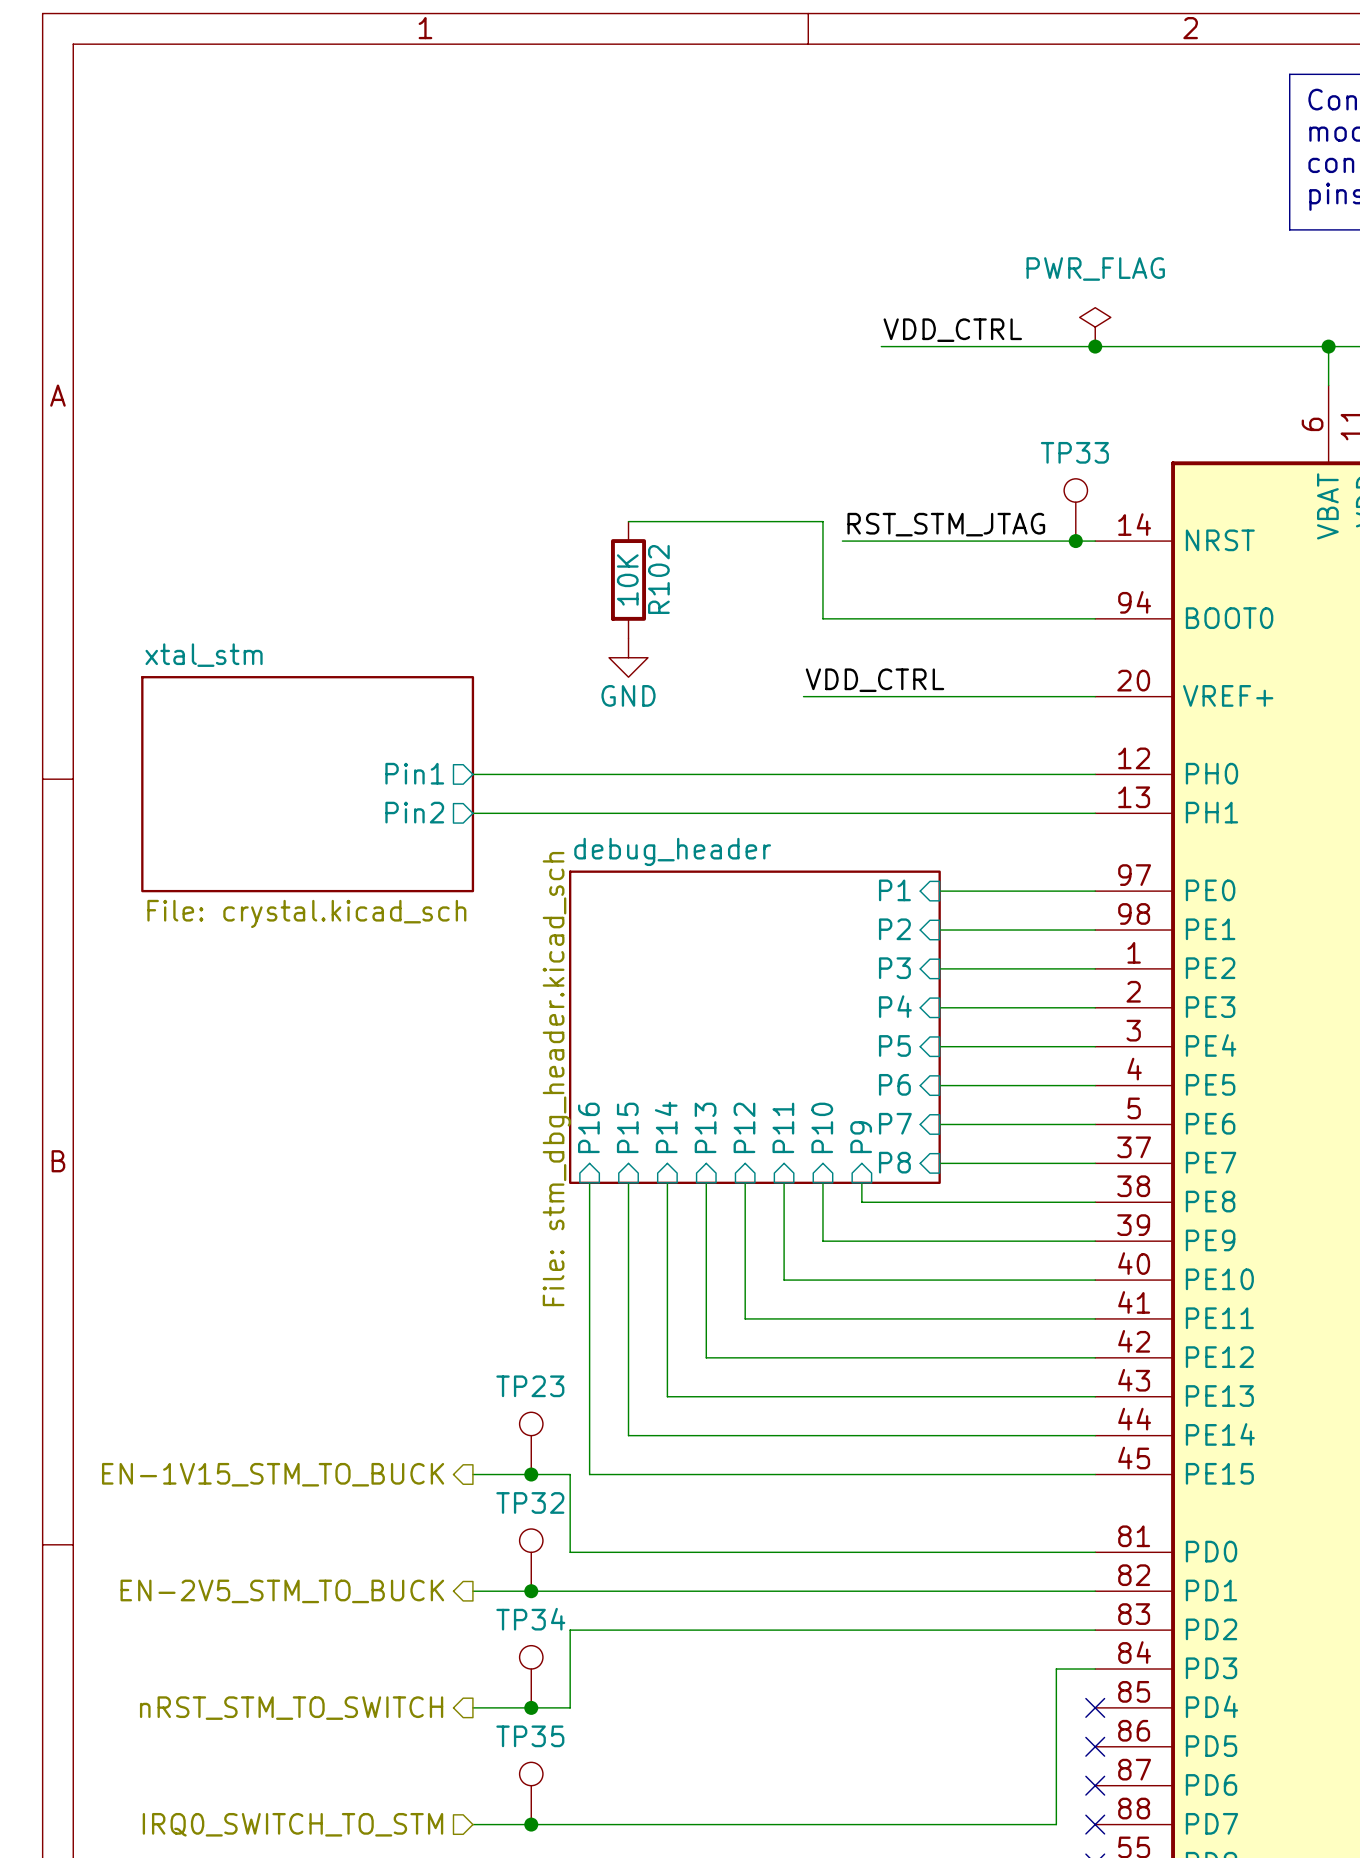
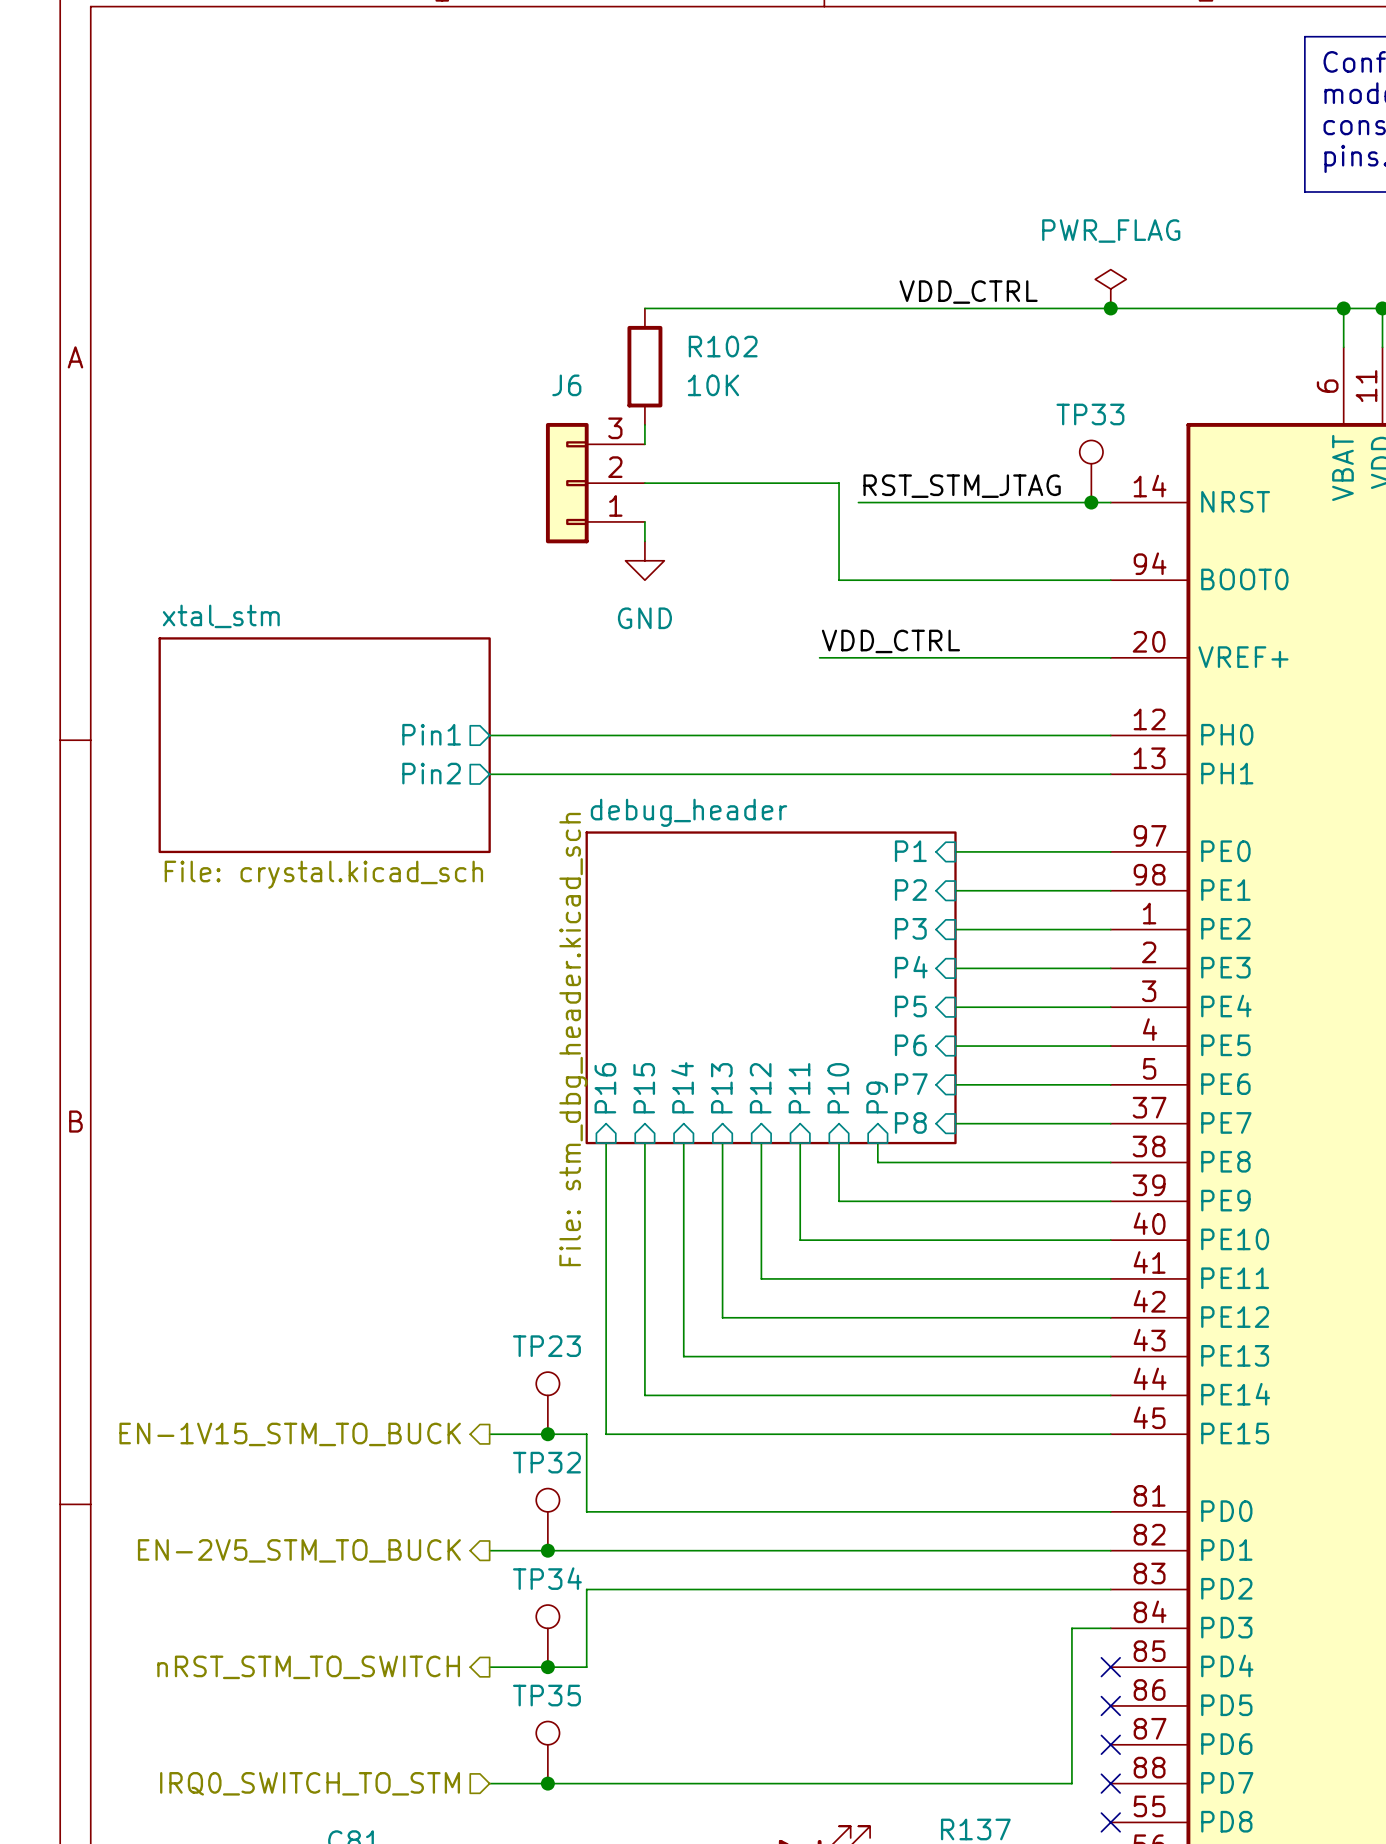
wire: none -> (644, 308) (897, 308)
wire: none -> (644, 424) (644, 444)
J6: none -> (595, 483)
wire: none -> (644, 521) (644, 541)
R102 value rotation: 0° (627, 579) -> 90° clockwise (713, 385)
R102 value position: 10K (627, 579) -> 10K (713, 385)
R102 position: (628, 579) -> (644, 366)
R102 name rotation: 0° (658, 579) -> 90° clockwise (723, 346)
power symbol position: GND (628, 657) -> GND (644, 560)
power symbol text position: GND (628, 695) -> GND (644, 618)

